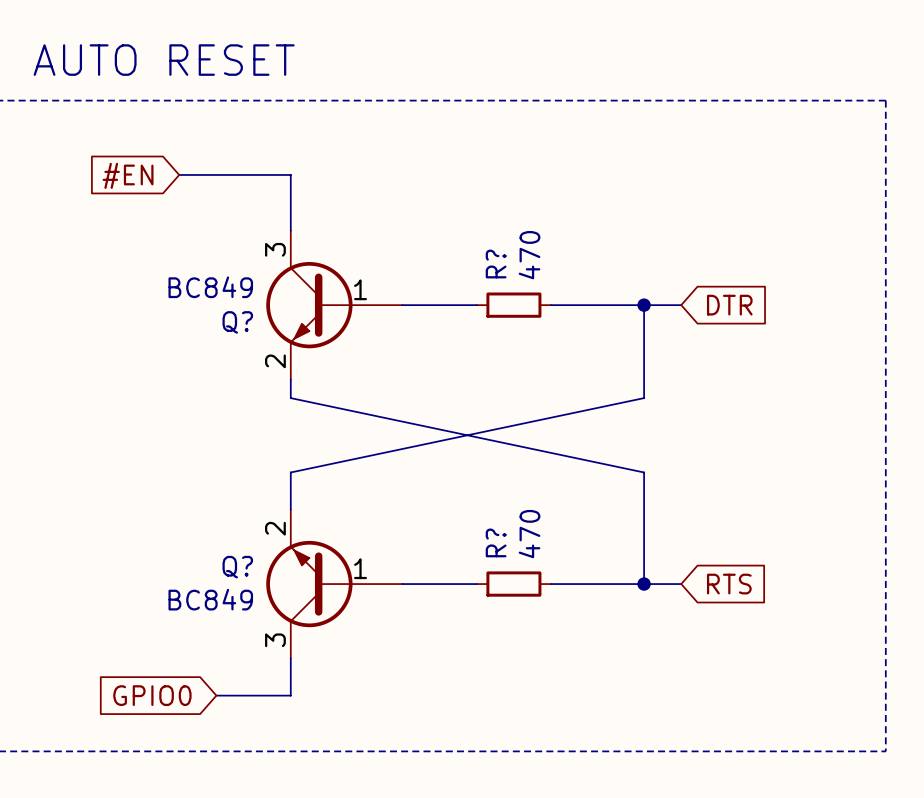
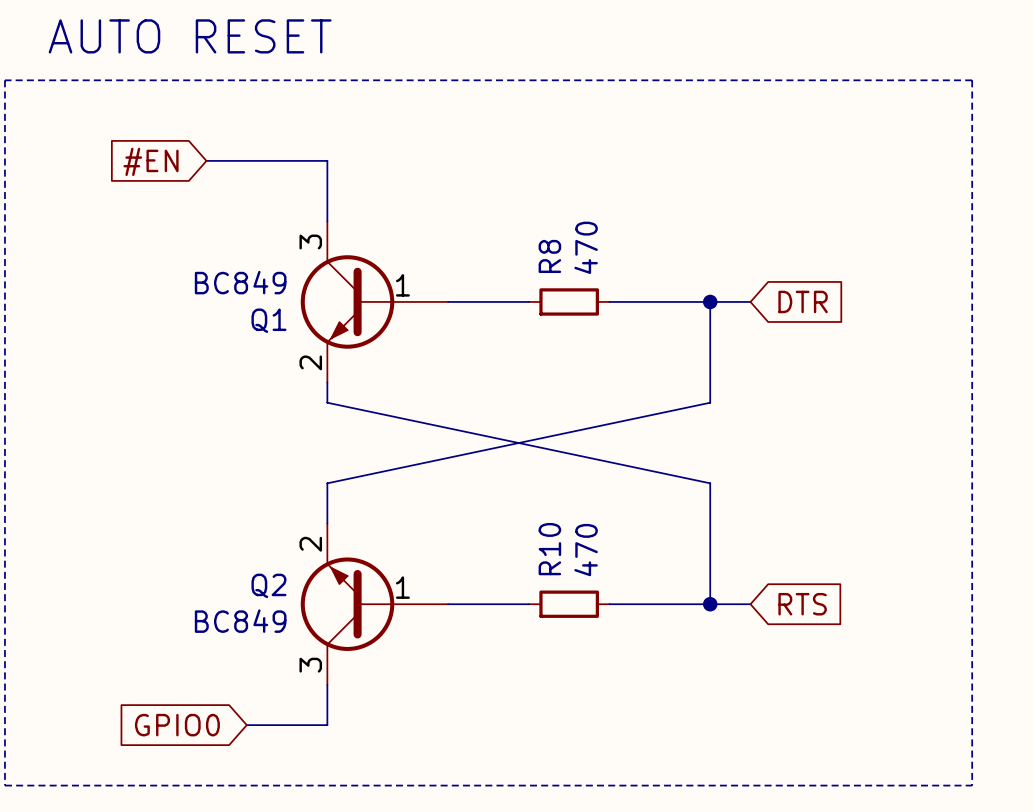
R? name: R? (496, 264) -> R8 (549, 256)
Q? name: Q? (237, 322) -> Q1 (268, 320)
R? name: R? (496, 542) -> R10 (549, 549)
Q? name: Q? (237, 567) -> Q2 (268, 585)

